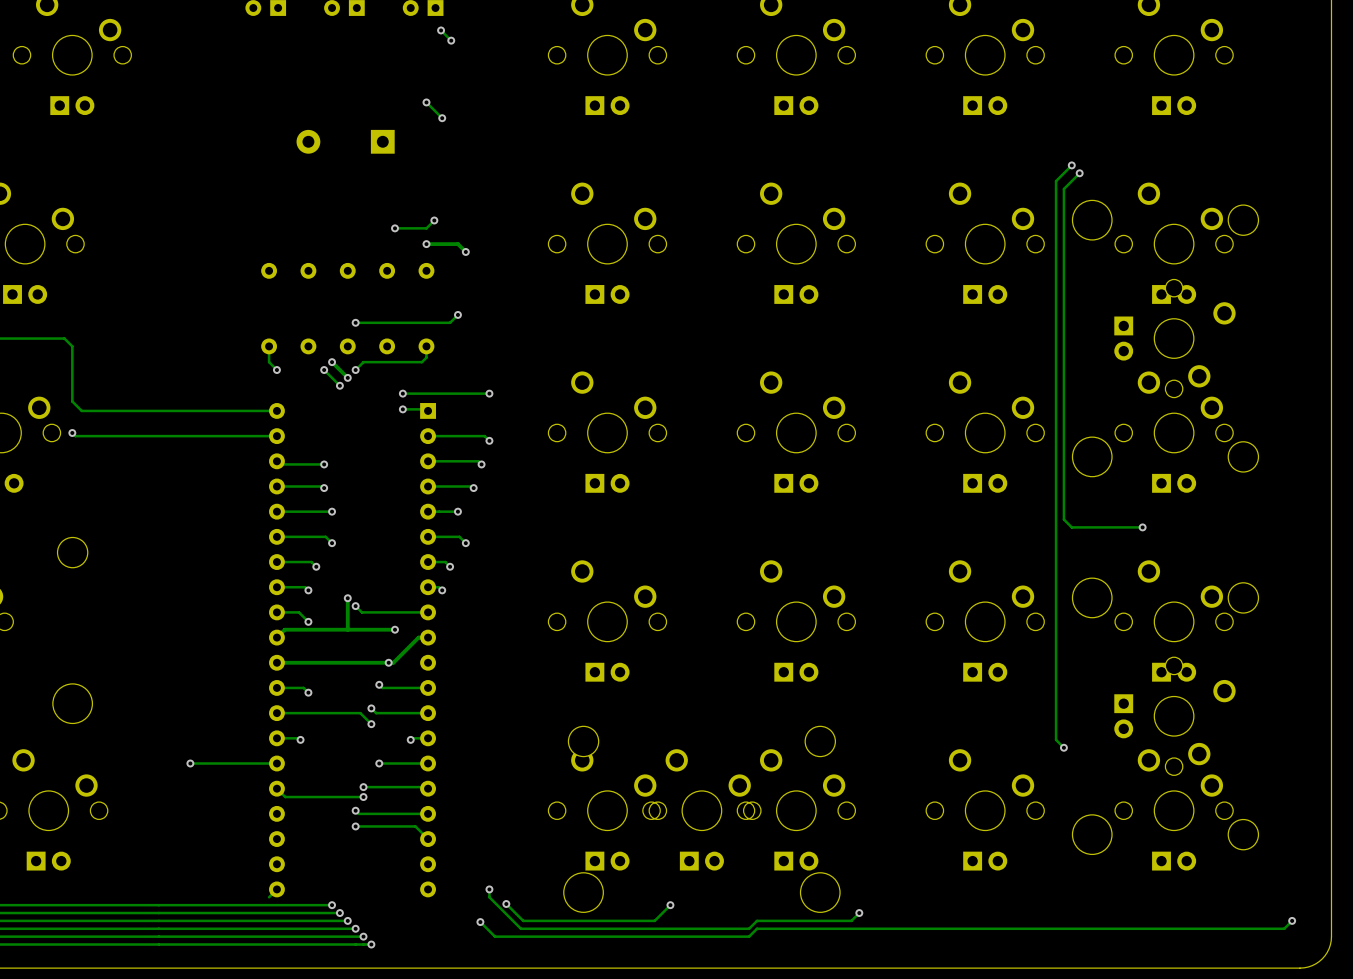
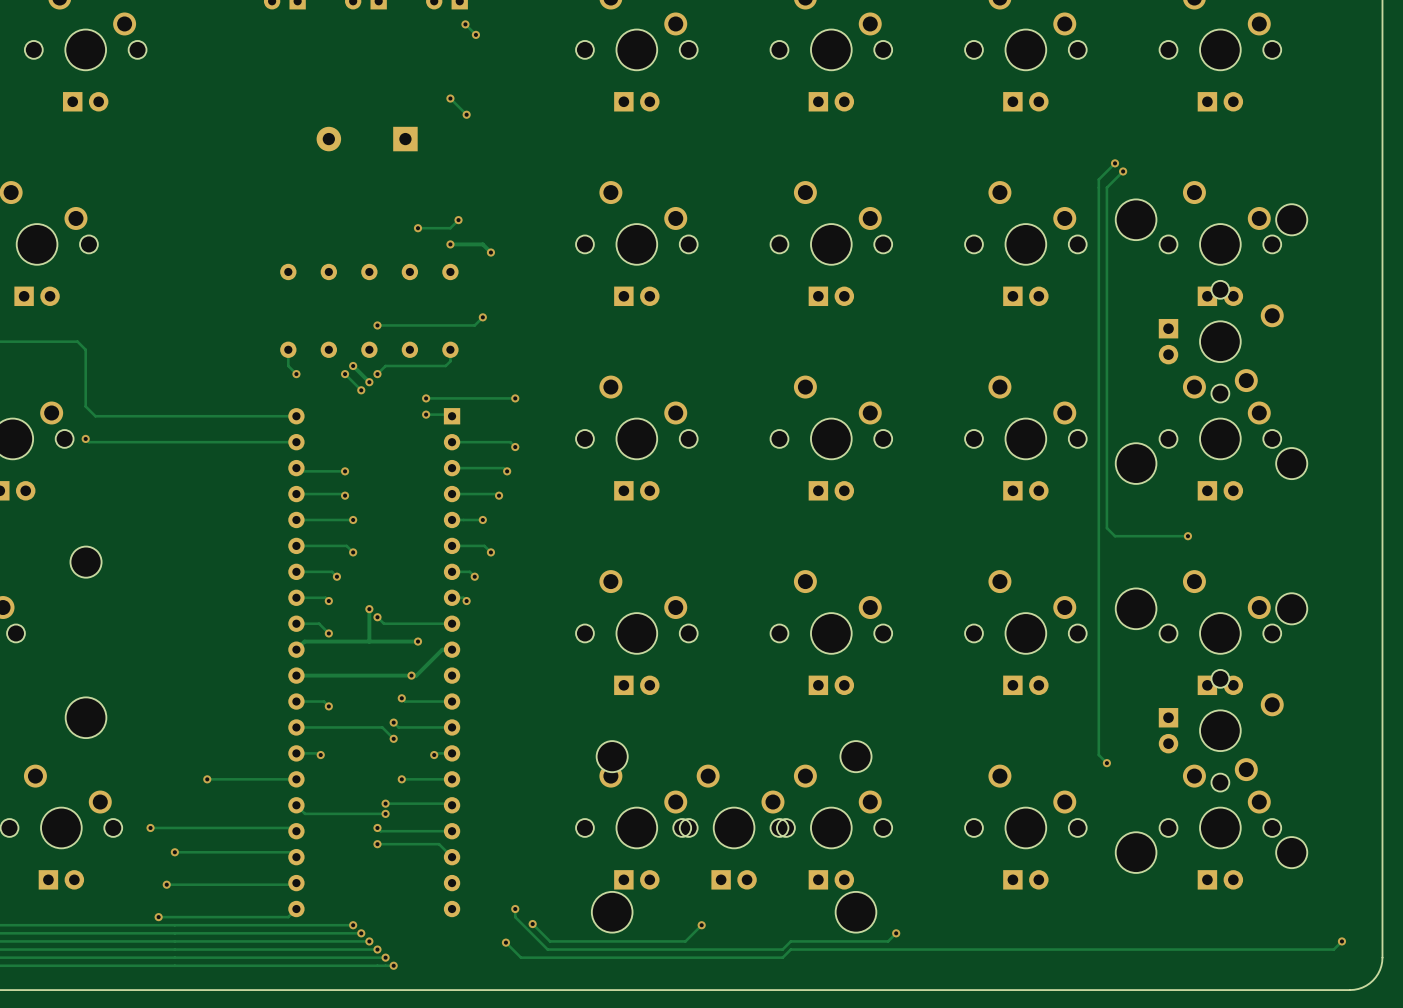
via: none -> (150, 827)
track: none -> (293, 827) (150, 827)
via: none -> (174, 852)
track: none -> (291, 852) (174, 852)
via: none -> (166, 884)
track: none -> (294, 884) (166, 884)
via: none -> (158, 917)
track: none -> (288, 917) (158, 917)

